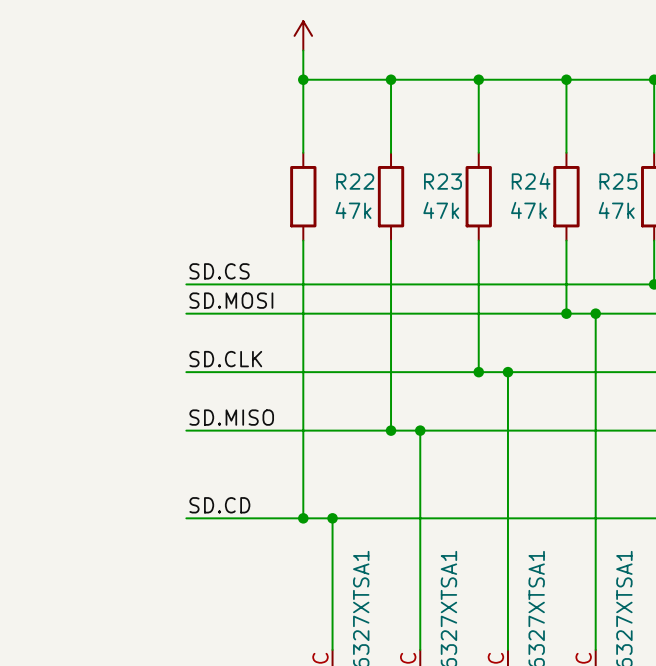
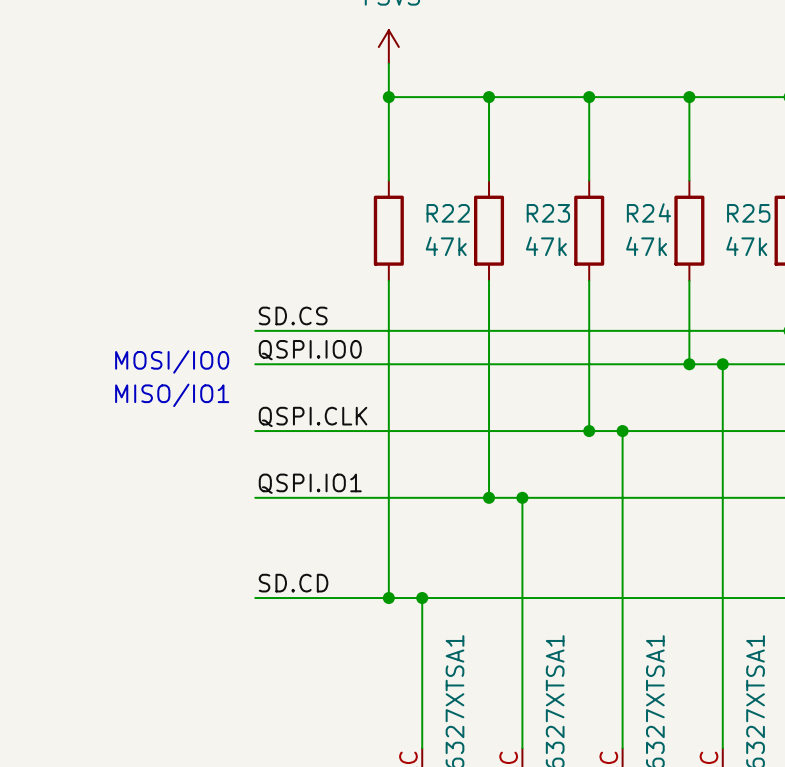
label: SD.MOSI (231, 300) -> QSPI.IO0 (310, 350)
text: none -> MOSI/IO0 (172, 361)
text: none -> MISO/IO1 (172, 395)
label: SD.CLK (225, 359) -> QSPI.CLK (313, 416)
label: SD.MISO (231, 417) -> QSPI.IO1 (310, 483)

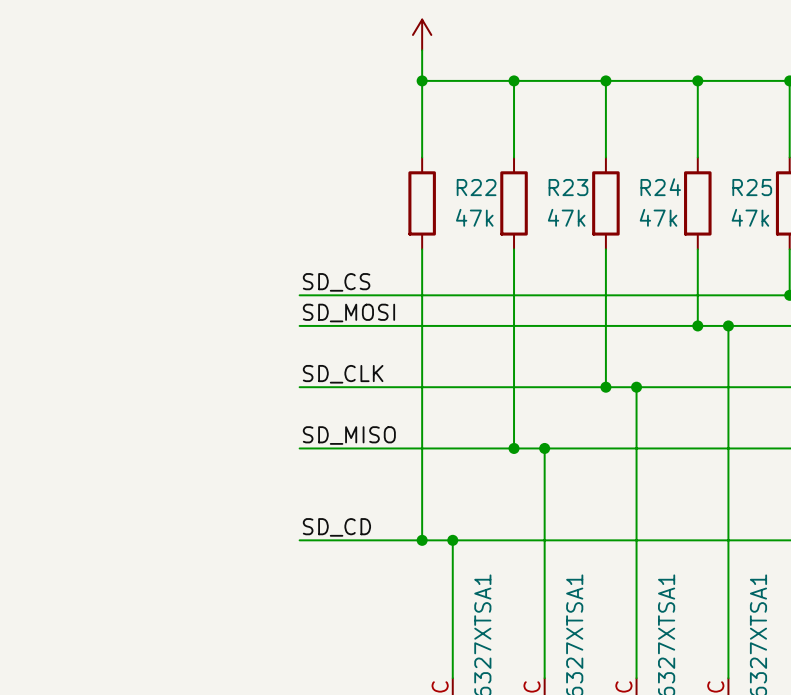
label: SD.CS (293, 315) -> SD_CS (336, 282)
label: QSPI.IO0 (310, 350) -> SD_MOSI (348, 313)
text: MOSI/IO0 (172, 361) -> none
text: MISO/IO1 (172, 395) -> none
label: QSPI.CLK (313, 416) -> SD_CLK (343, 374)
label: QSPI.IO1 (310, 483) -> SD_MISO (349, 435)
label: SD.CD (293, 583) -> SD_CD (336, 527)

